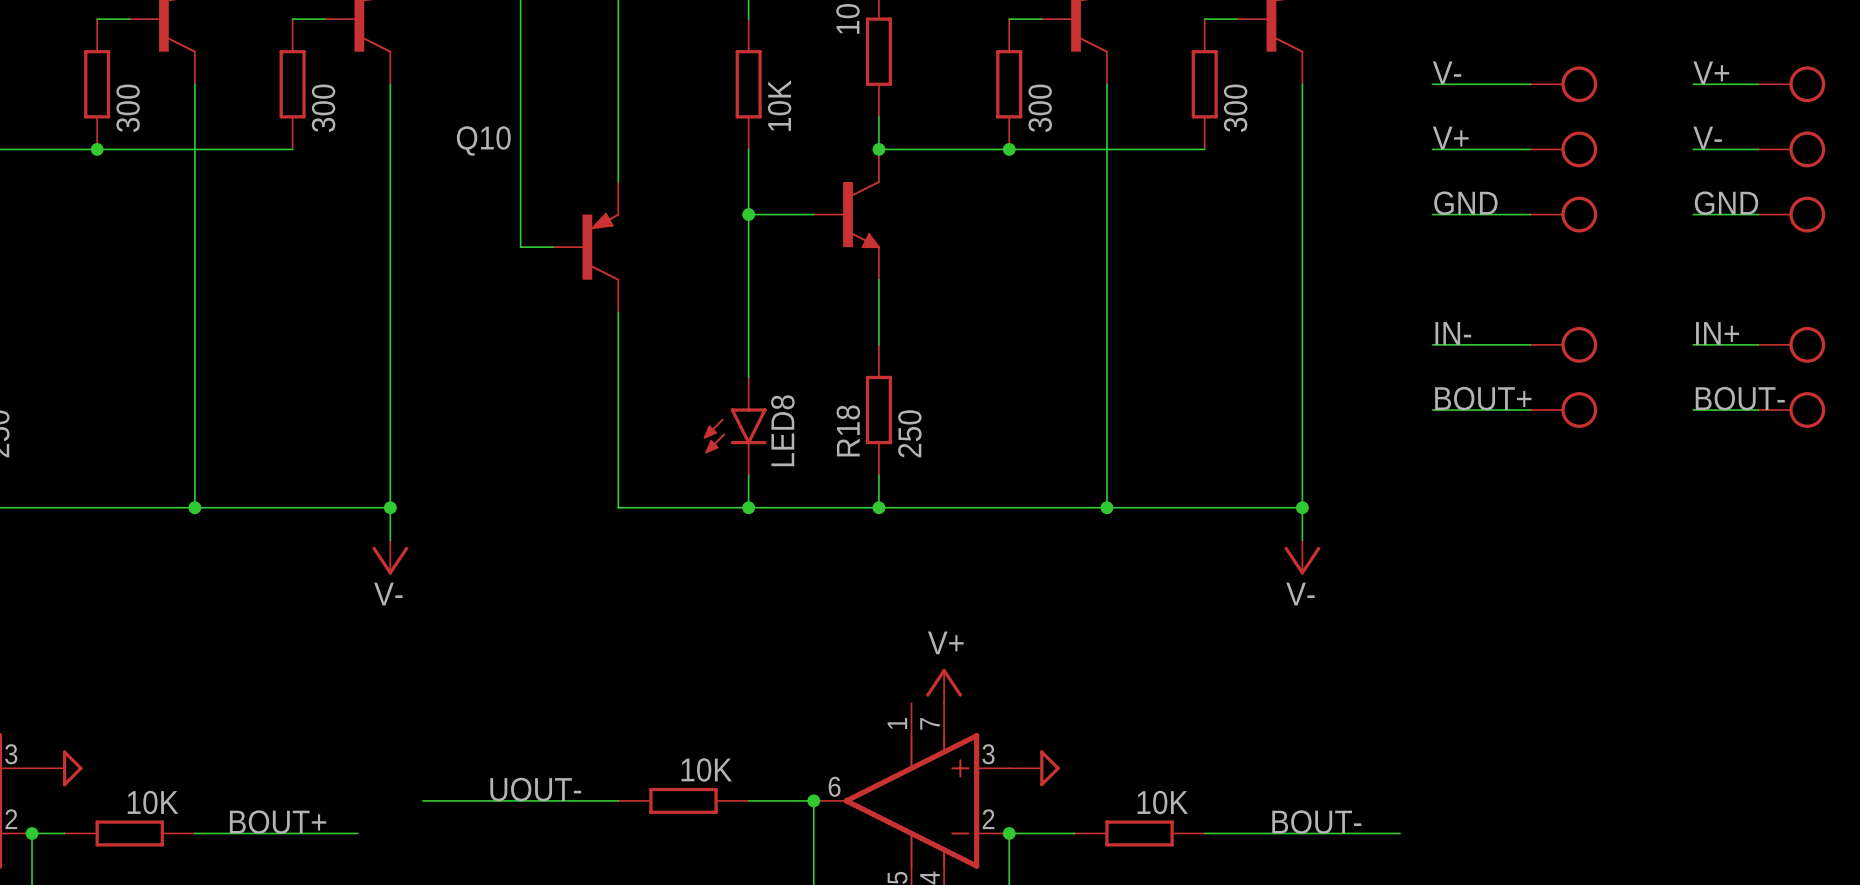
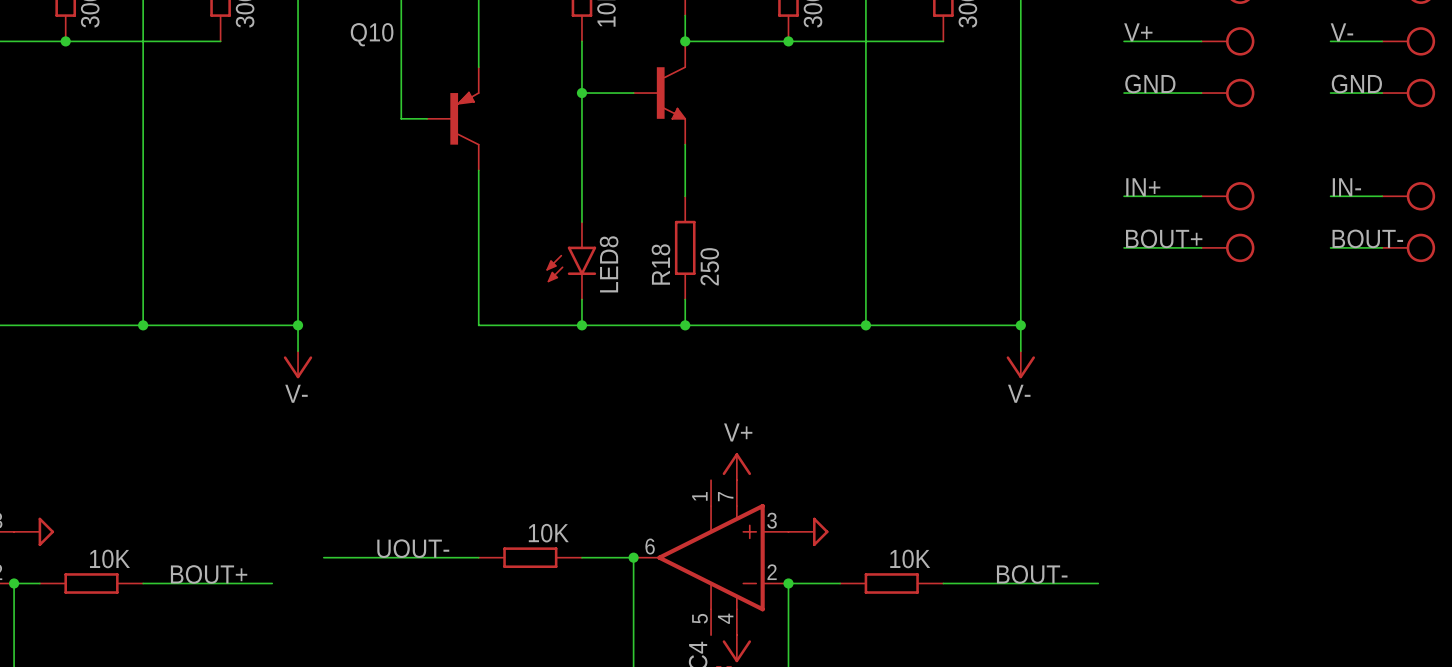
label: IN- (1453, 333) -> IN+ (1143, 187)
label: IN+ (1717, 333) -> IN- (1346, 187)

